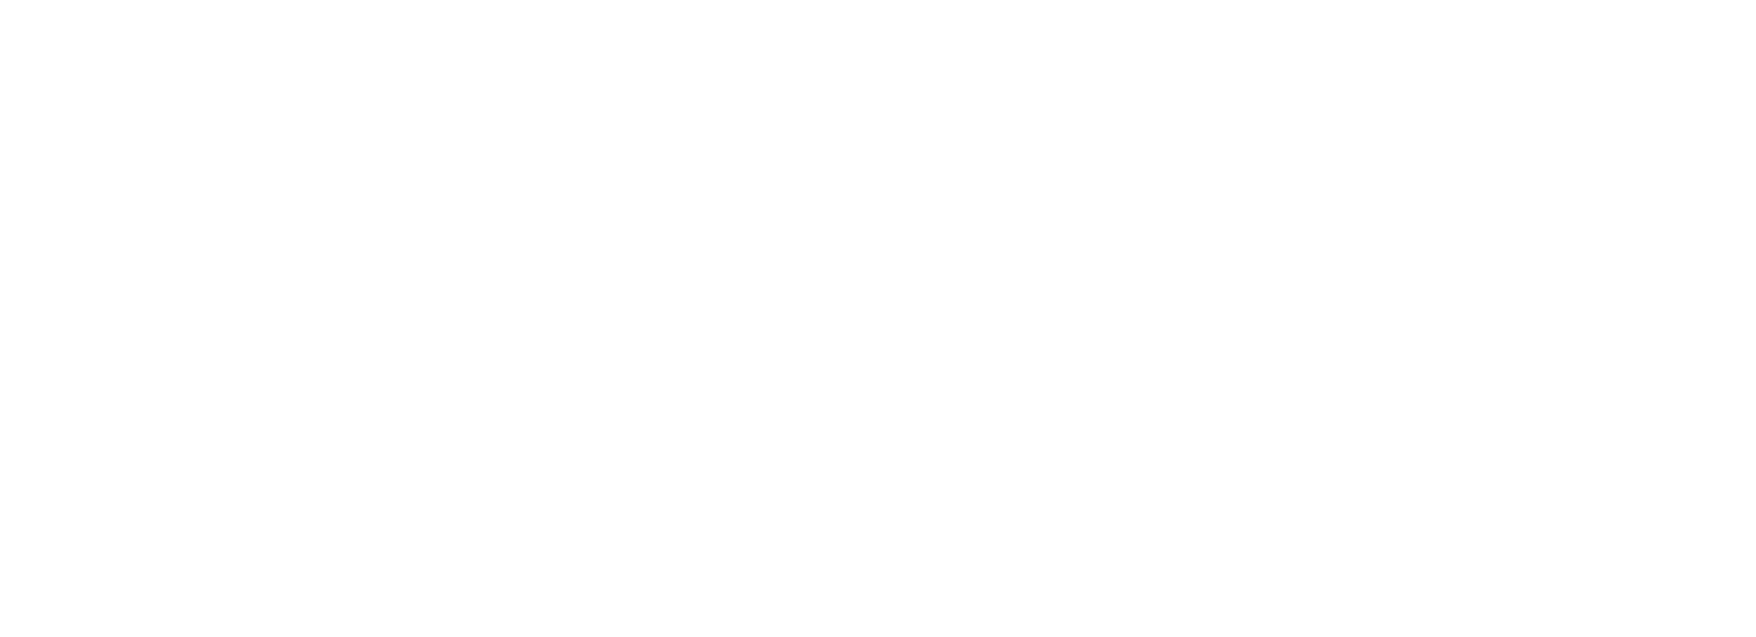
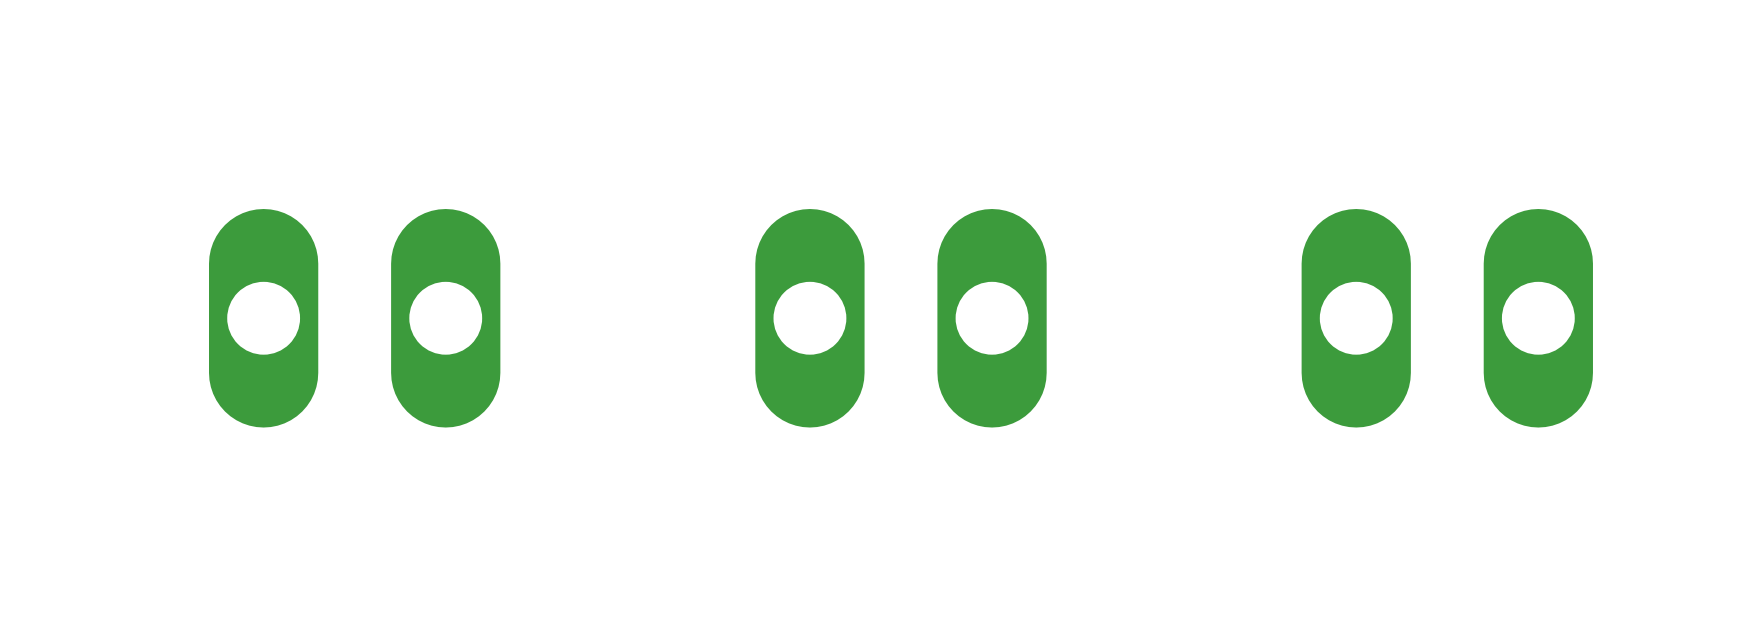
part: none -> (354, 318)
part: none -> (900, 318)
part: none -> (1447, 318)

